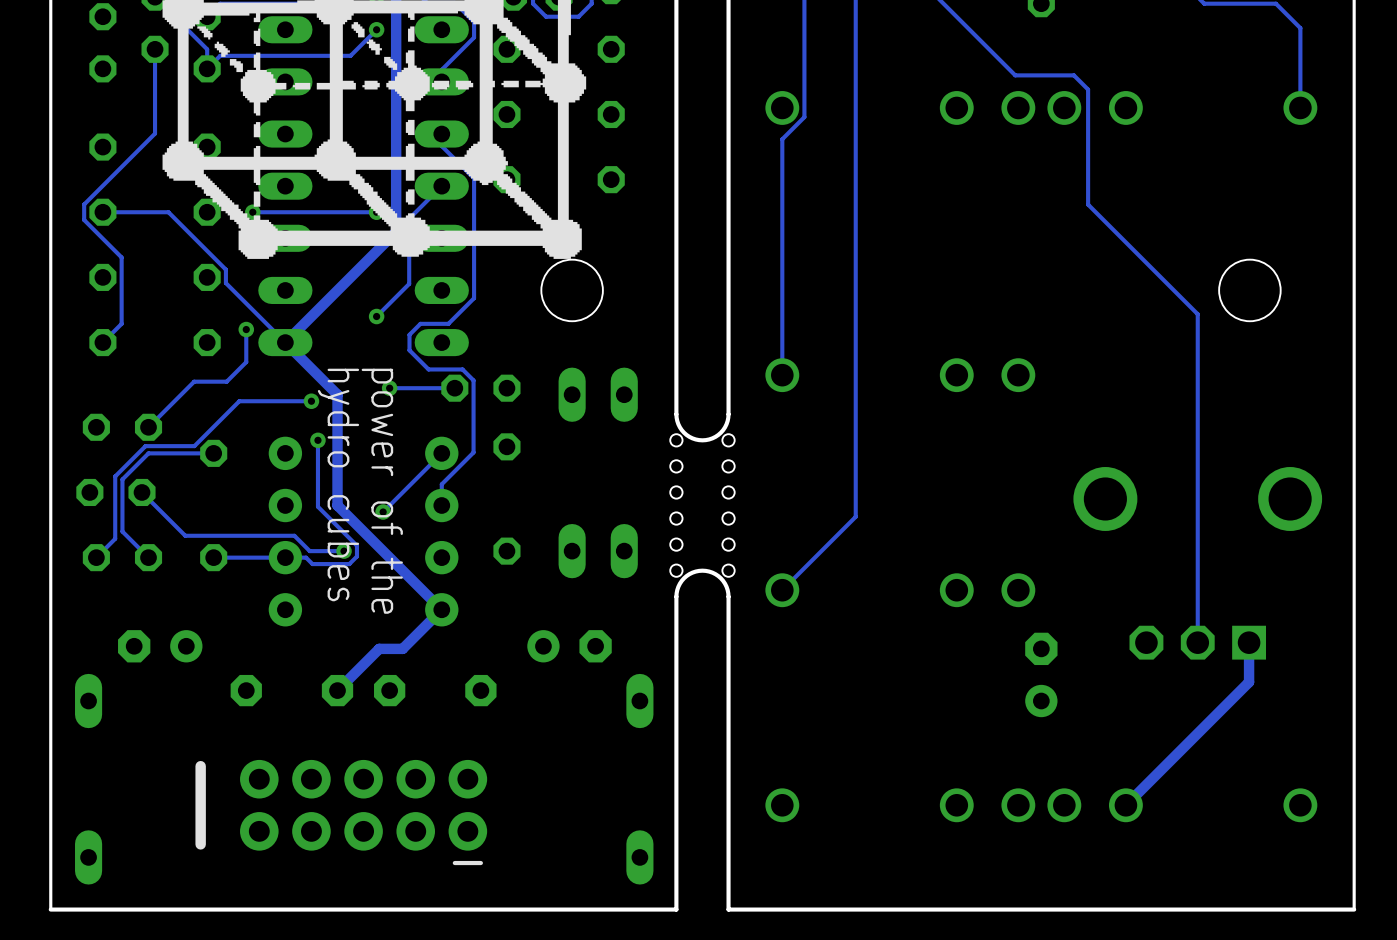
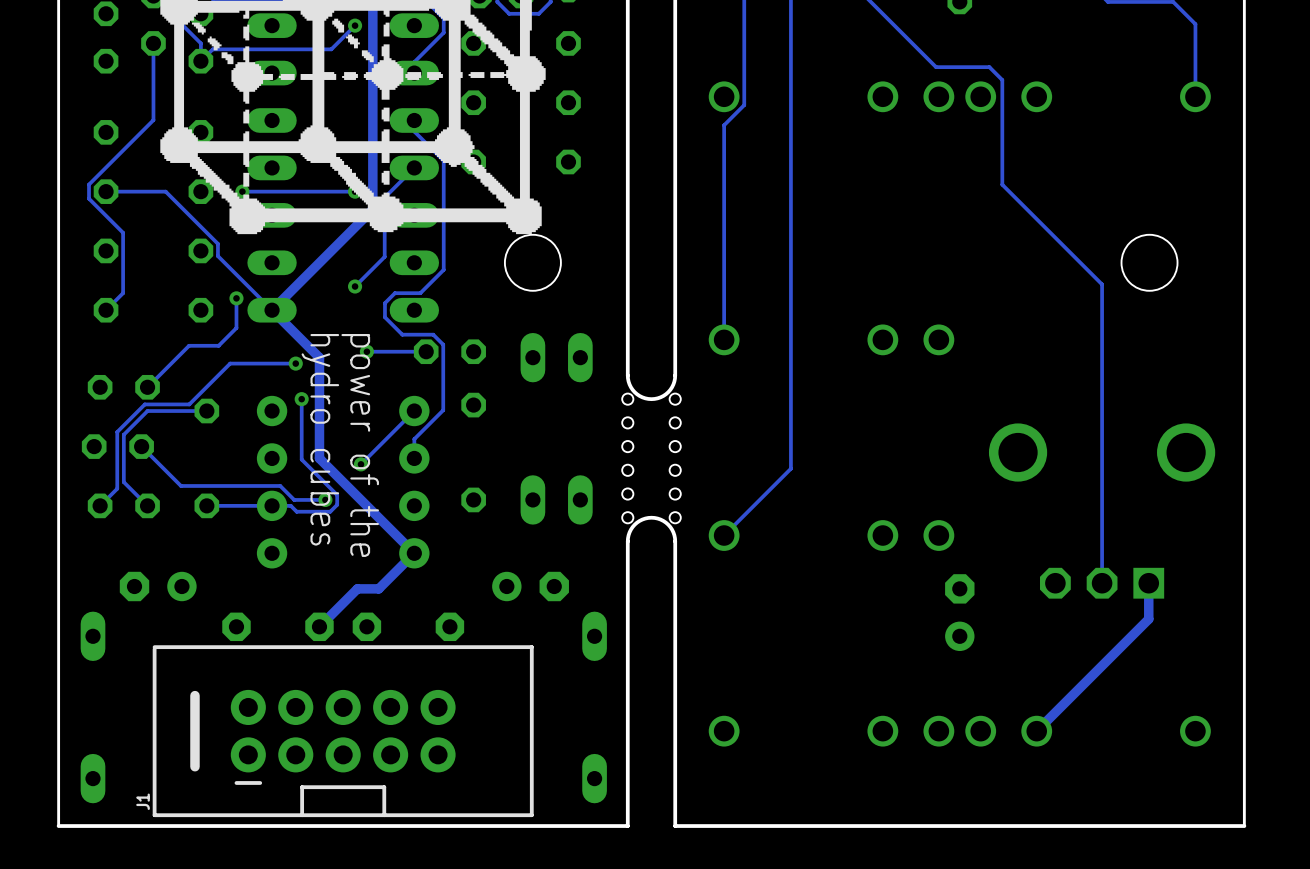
J1 side: top (363, 812) -> bottom (343, 731)

